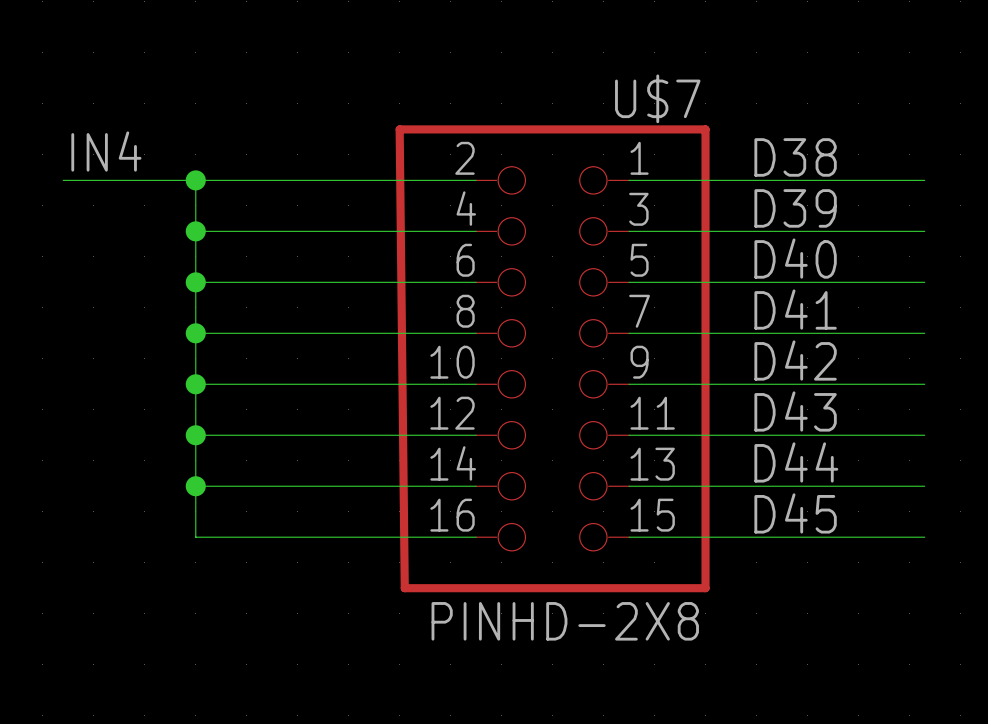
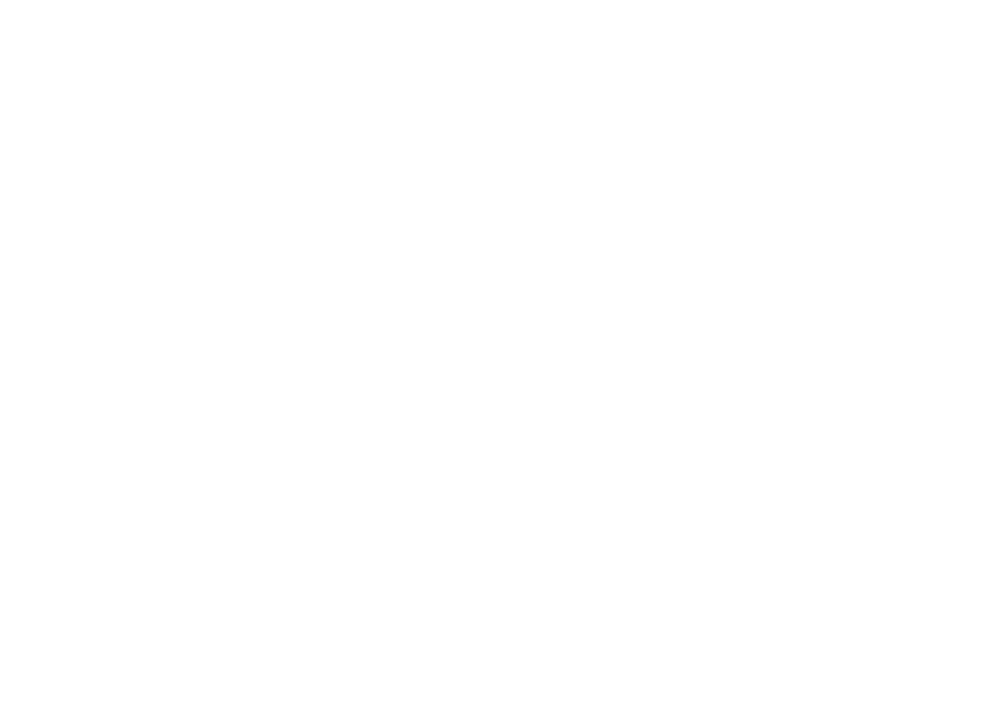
label: IN4 (106, 151) -> none
label: D38 (795, 157) -> none
wire: (63, 180) (476, 180) -> none
wire: (195, 180) (195, 537) (476, 537) -> none
junction: (195, 180) -> none
wire: (629, 180) (924, 180) -> none
label: D39 (795, 208) -> none
wire: (195, 231) (476, 231) -> none
junction: (195, 231) -> none
wire: (629, 231) (924, 231) -> none
label: D40 (795, 258) -> none
wire: (195, 282) (476, 282) -> none
junction: (195, 282) -> none
wire: (629, 282) (924, 282) -> none
label: D41 (795, 309) -> none
wire: (195, 333) (476, 333) -> none
junction: (195, 333) -> none
wire: (629, 333) (924, 333) -> none
U$7: PINHD-2X8 (552, 358) -> none
label: D42 (795, 360) -> none
wire: (195, 384) (476, 384) -> none
junction: (195, 384) -> none
wire: (629, 384) (924, 384) -> none
label: D43 (795, 411) -> none
wire: (195, 435) (476, 435) -> none
junction: (195, 435) -> none
wire: (629, 435) (924, 435) -> none
label: D44 (796, 462) -> none
wire: (195, 486) (476, 486) -> none
junction: (195, 486) -> none
wire: (629, 486) (924, 486) -> none
label: D45 (795, 513) -> none
wire: (629, 537) (924, 537) -> none

